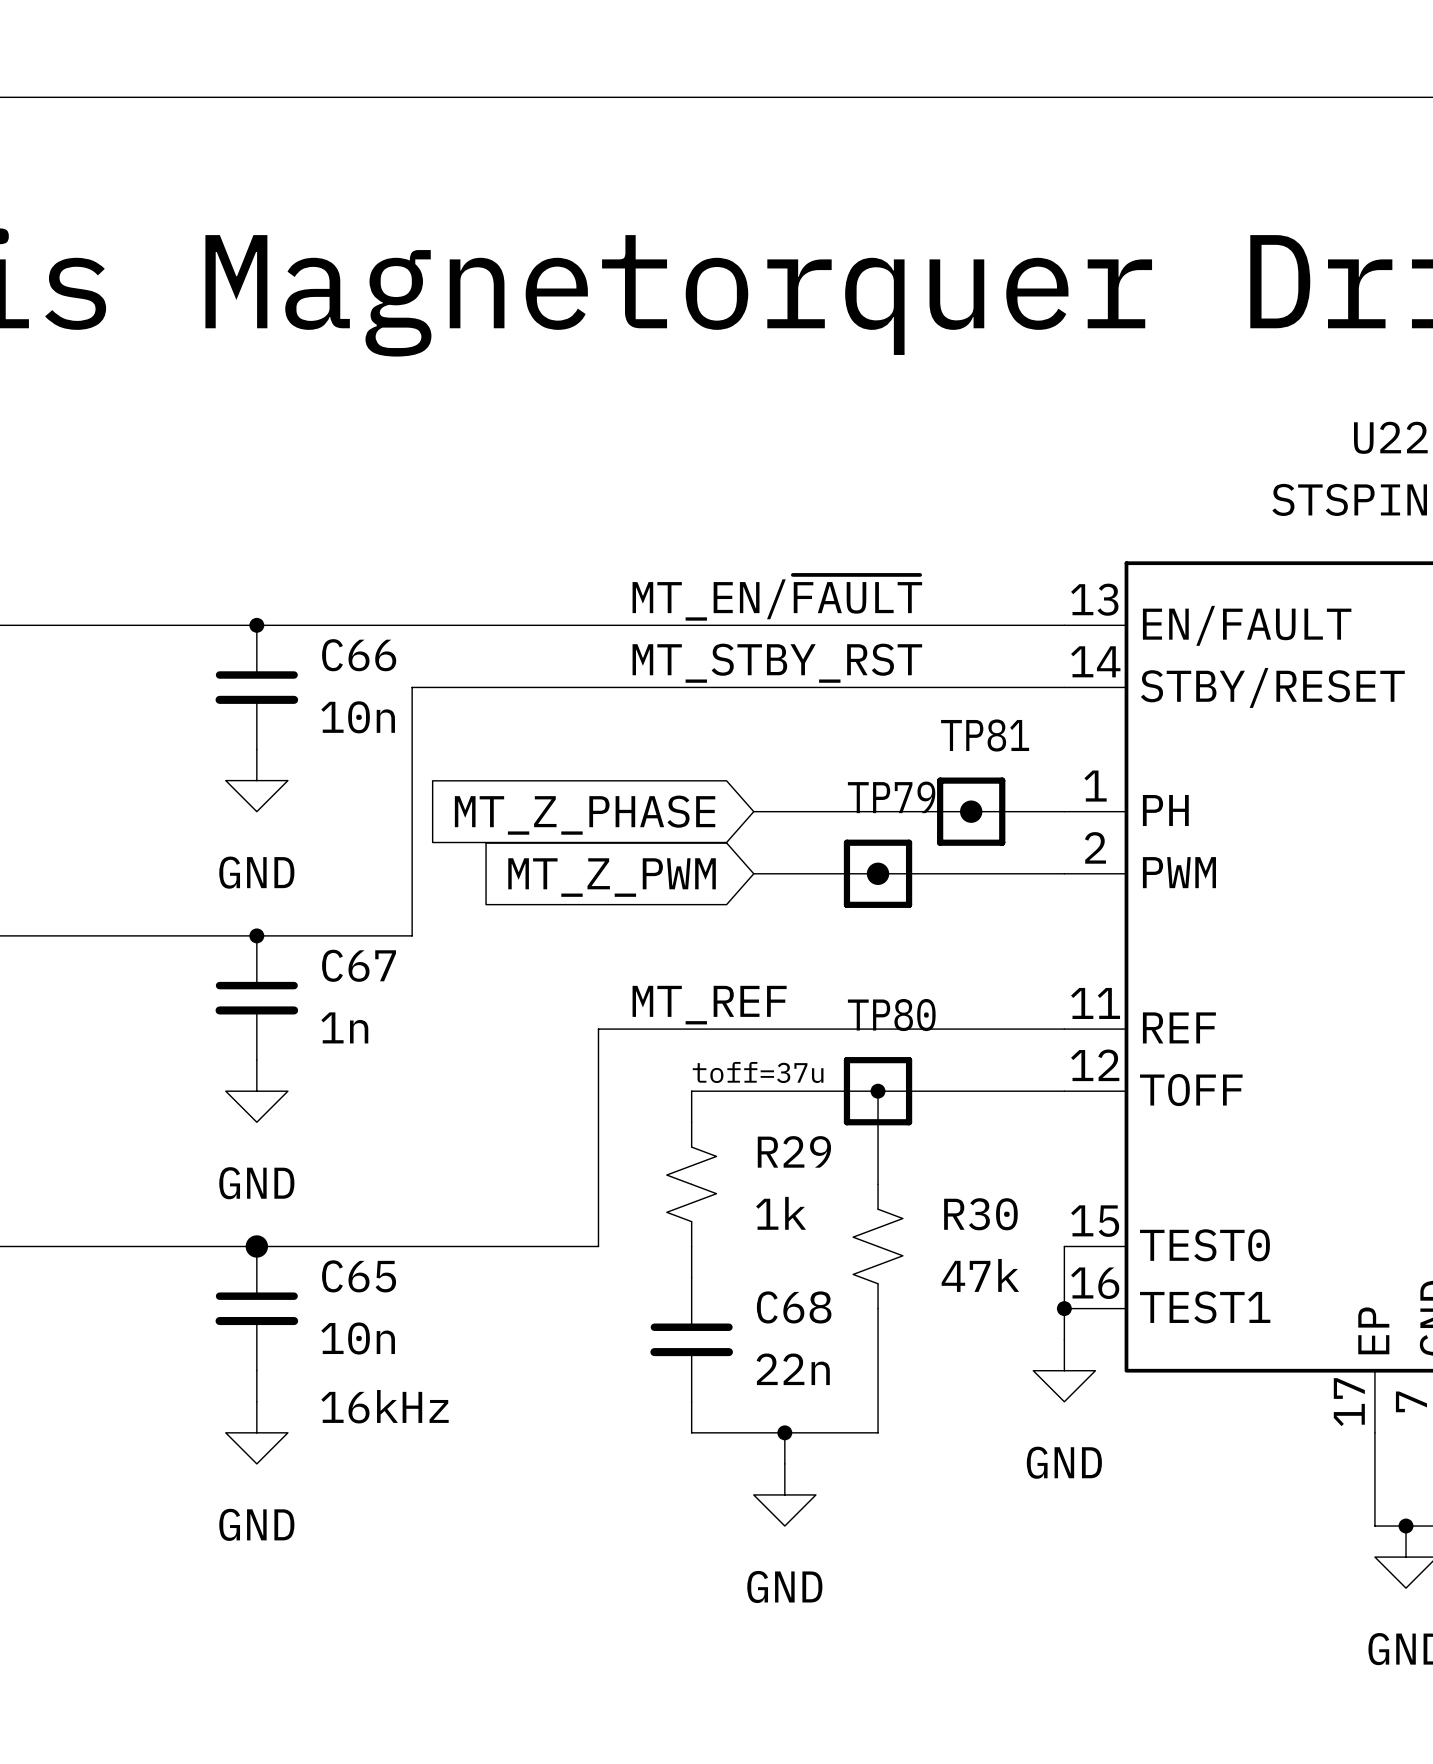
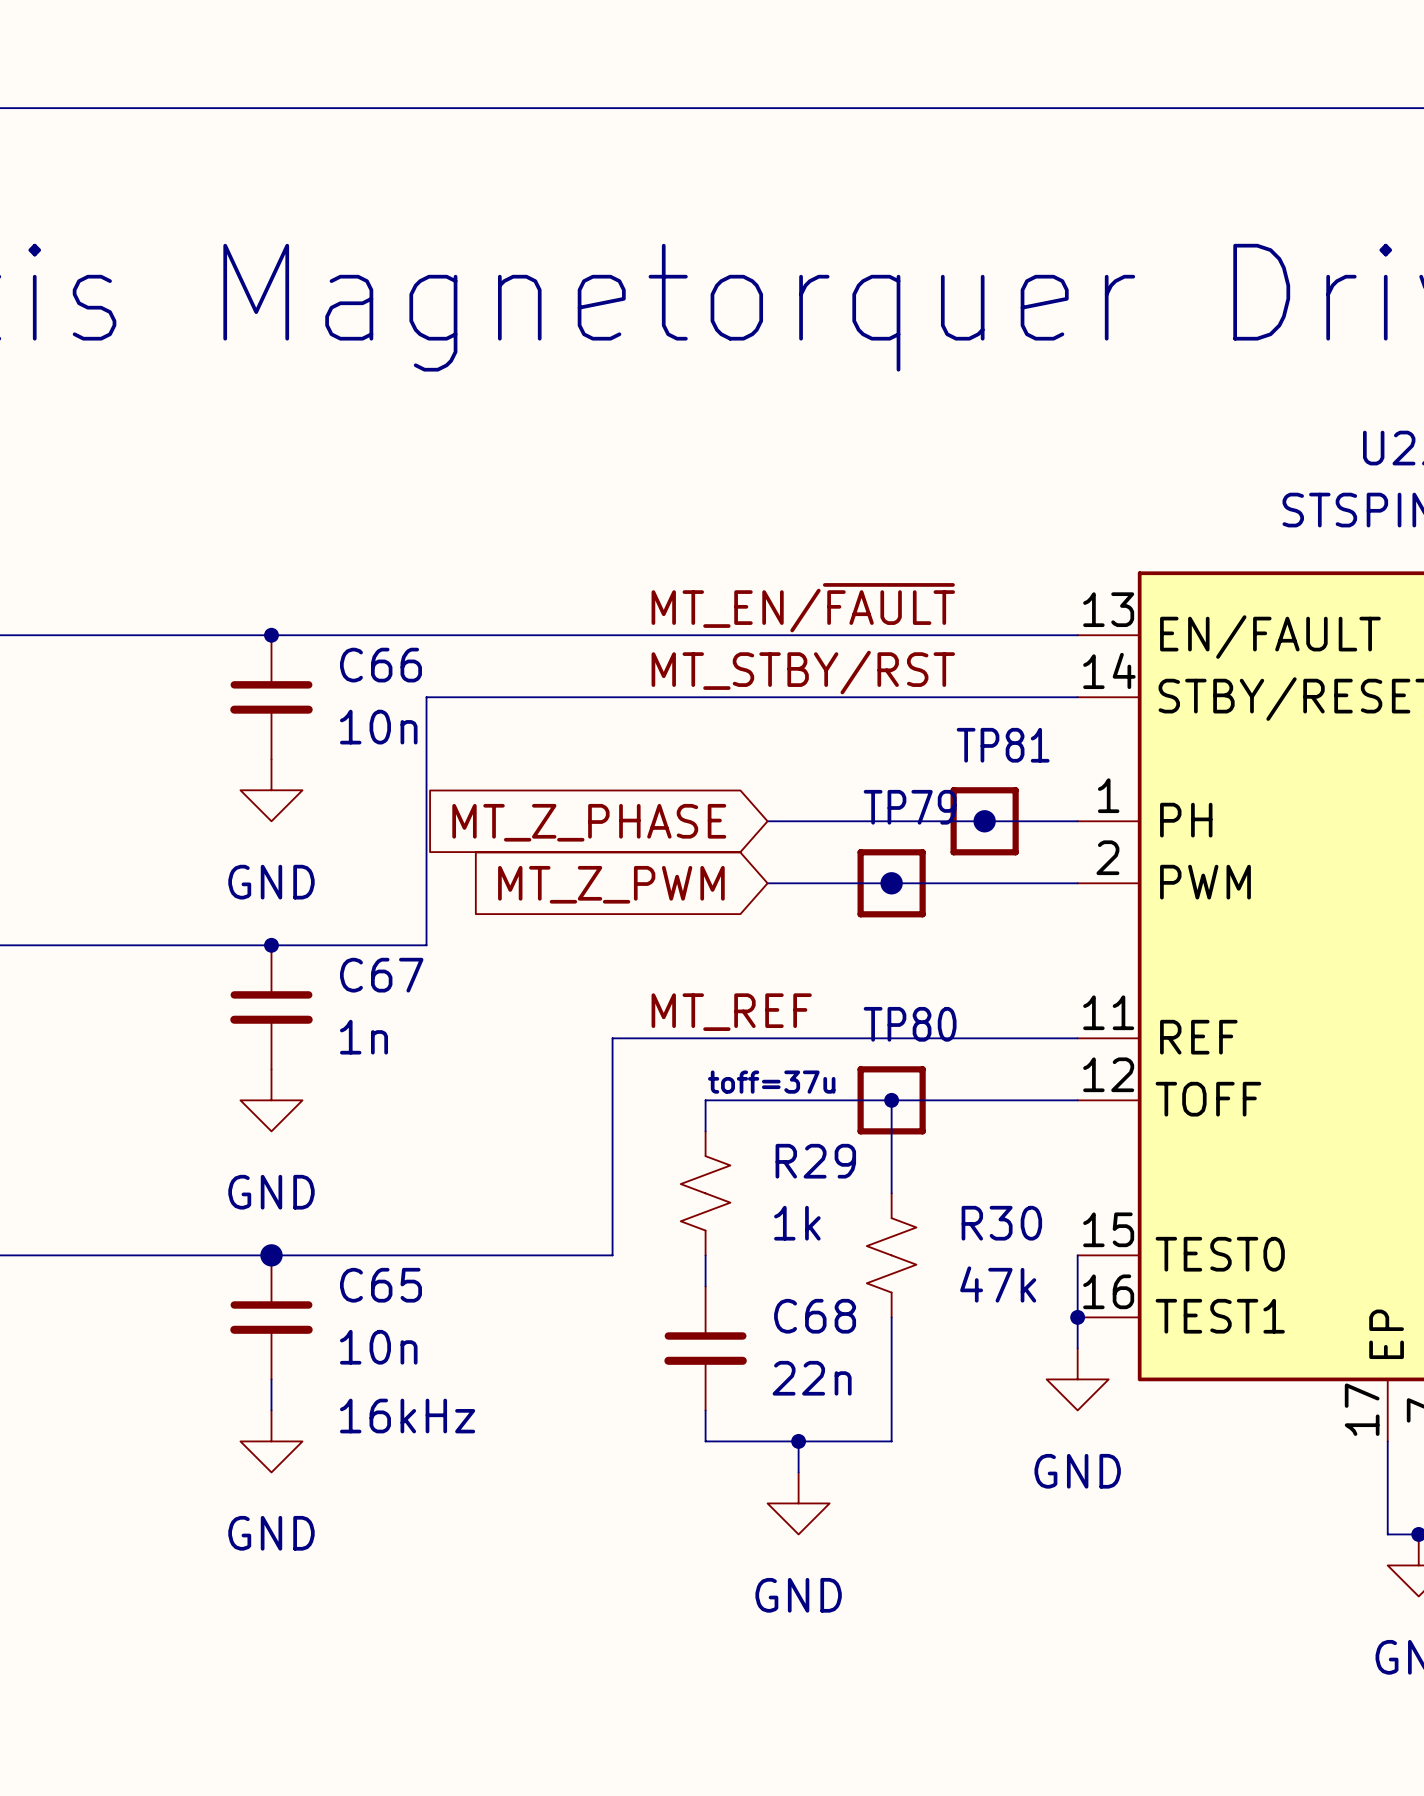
label: MT_STBY_RST (777, 663) -> MT_STBY/RST (803, 672)

